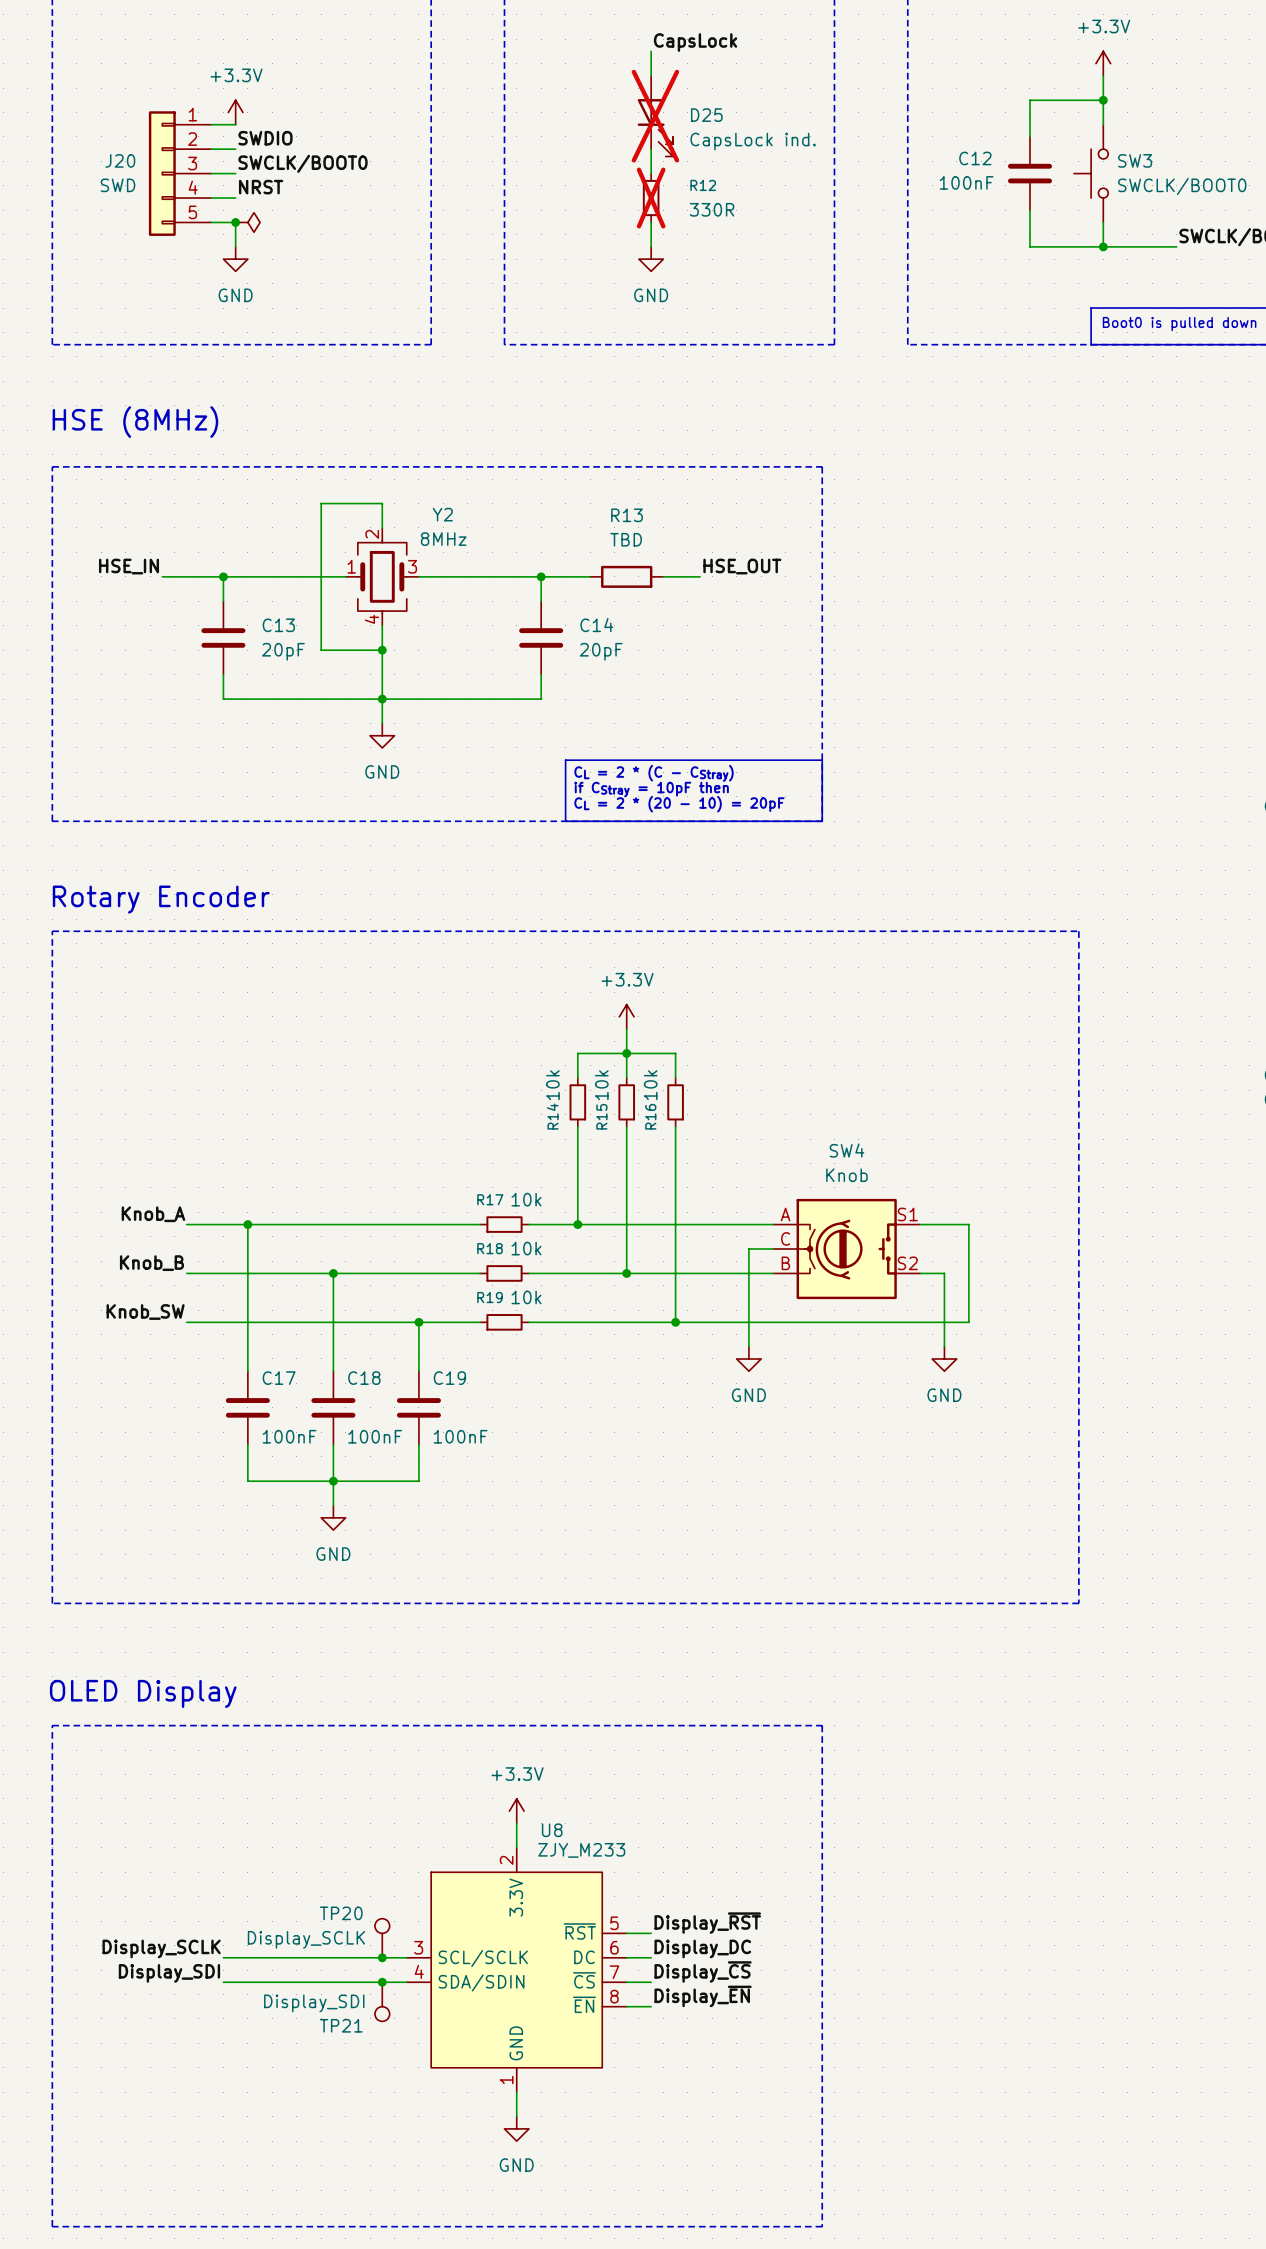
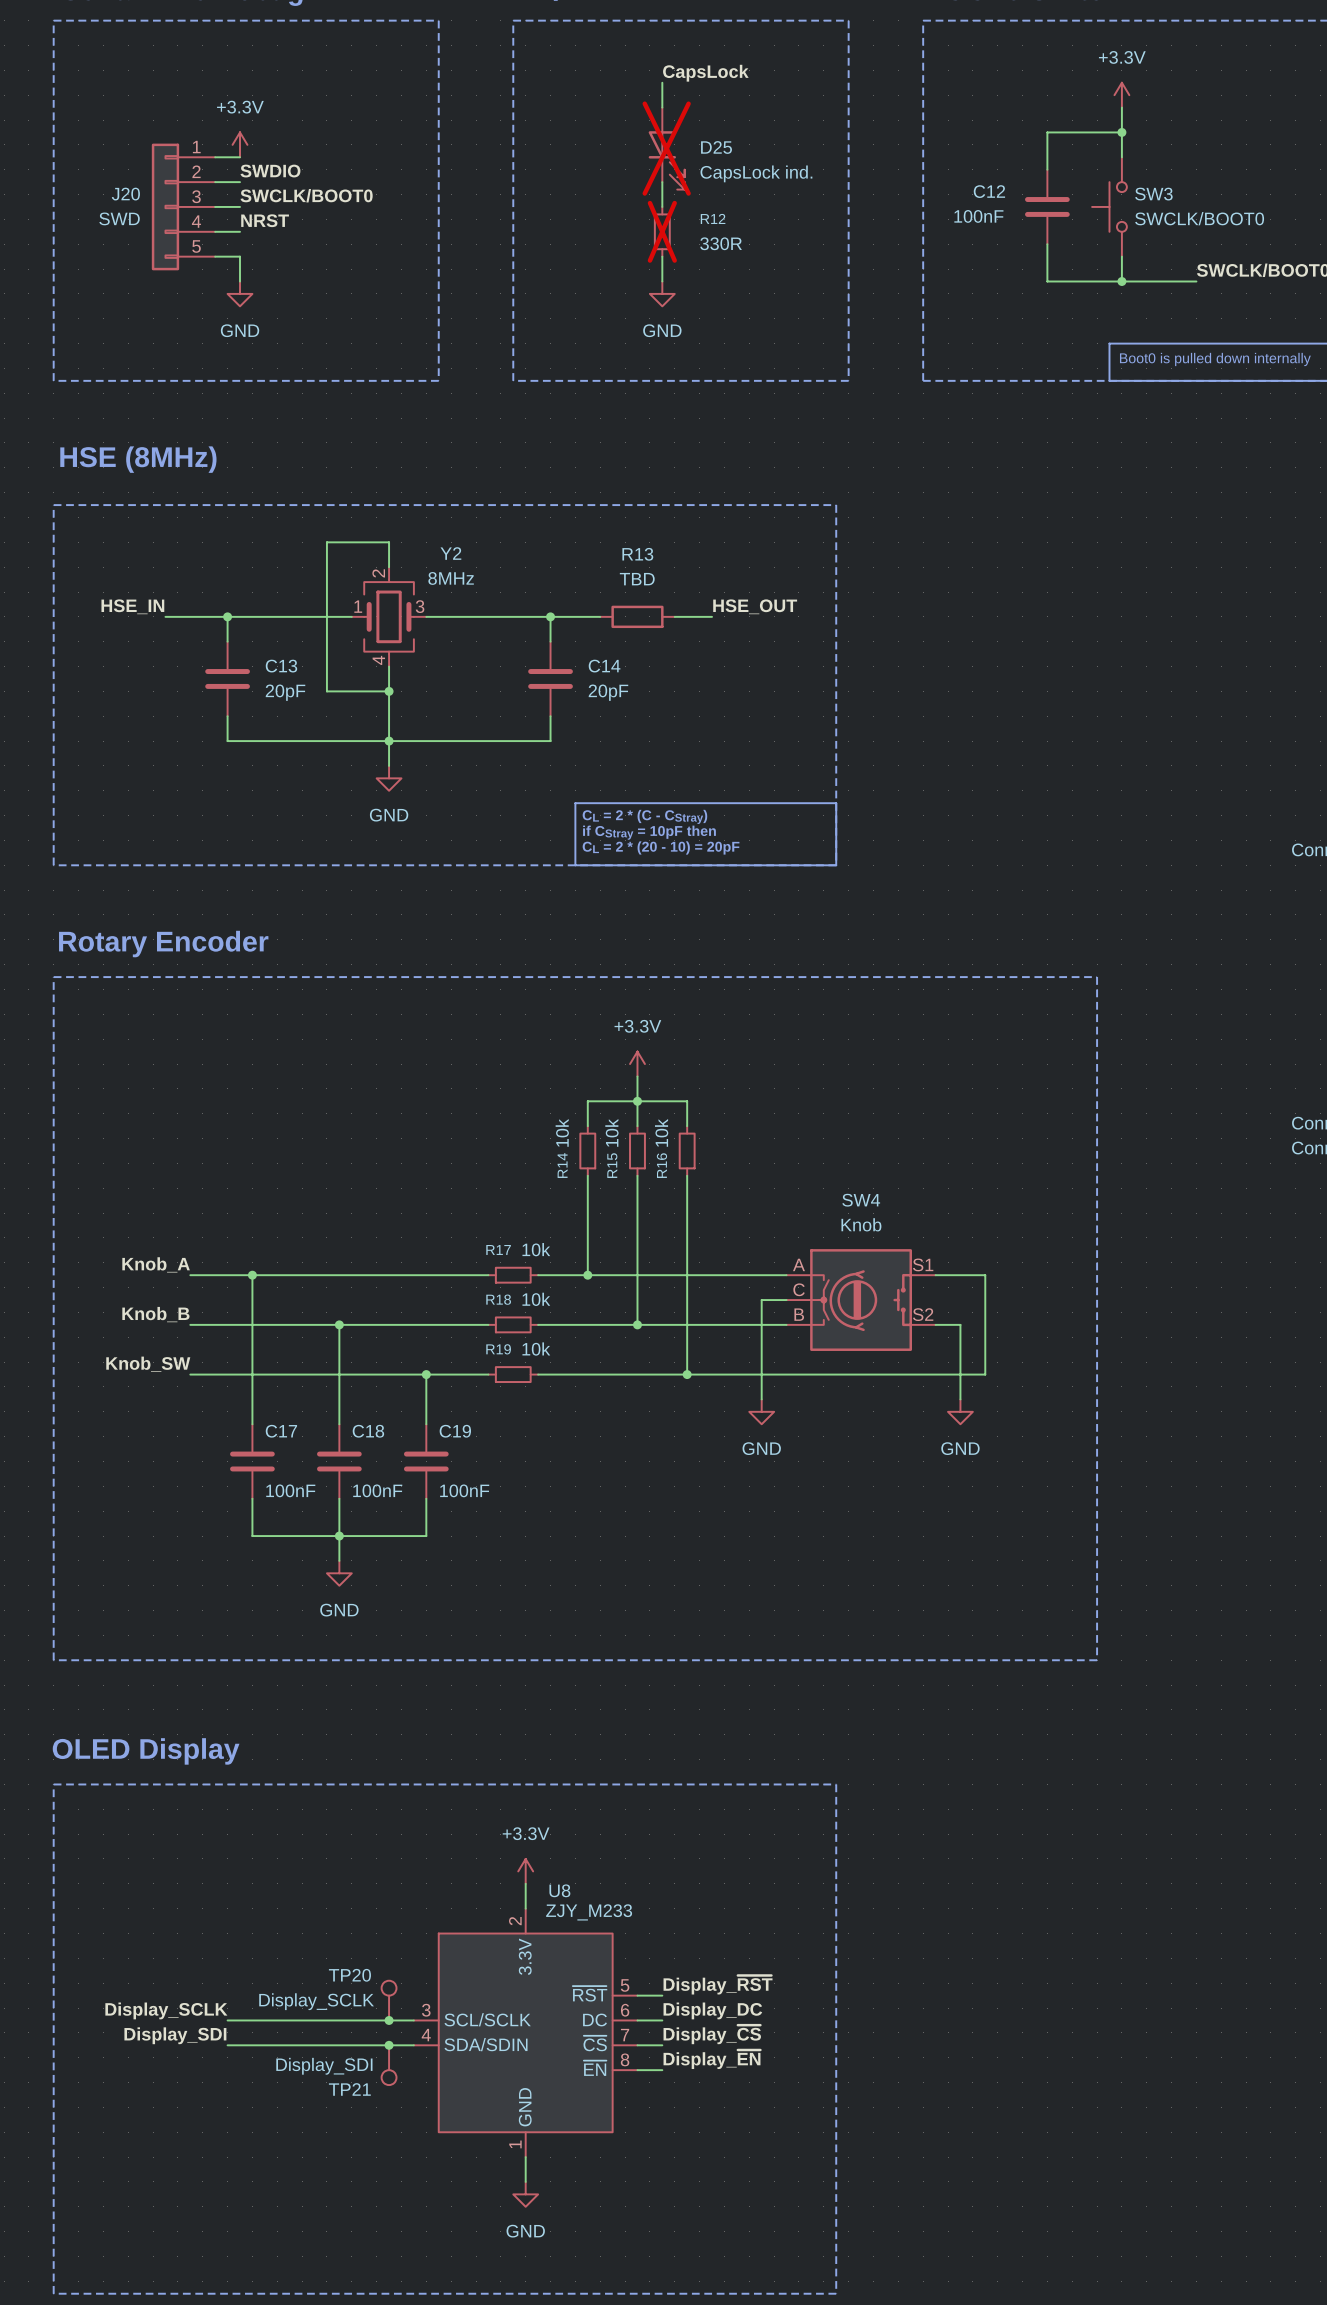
junction: (235, 222) -> none
power symbol: (247, 222) -> none

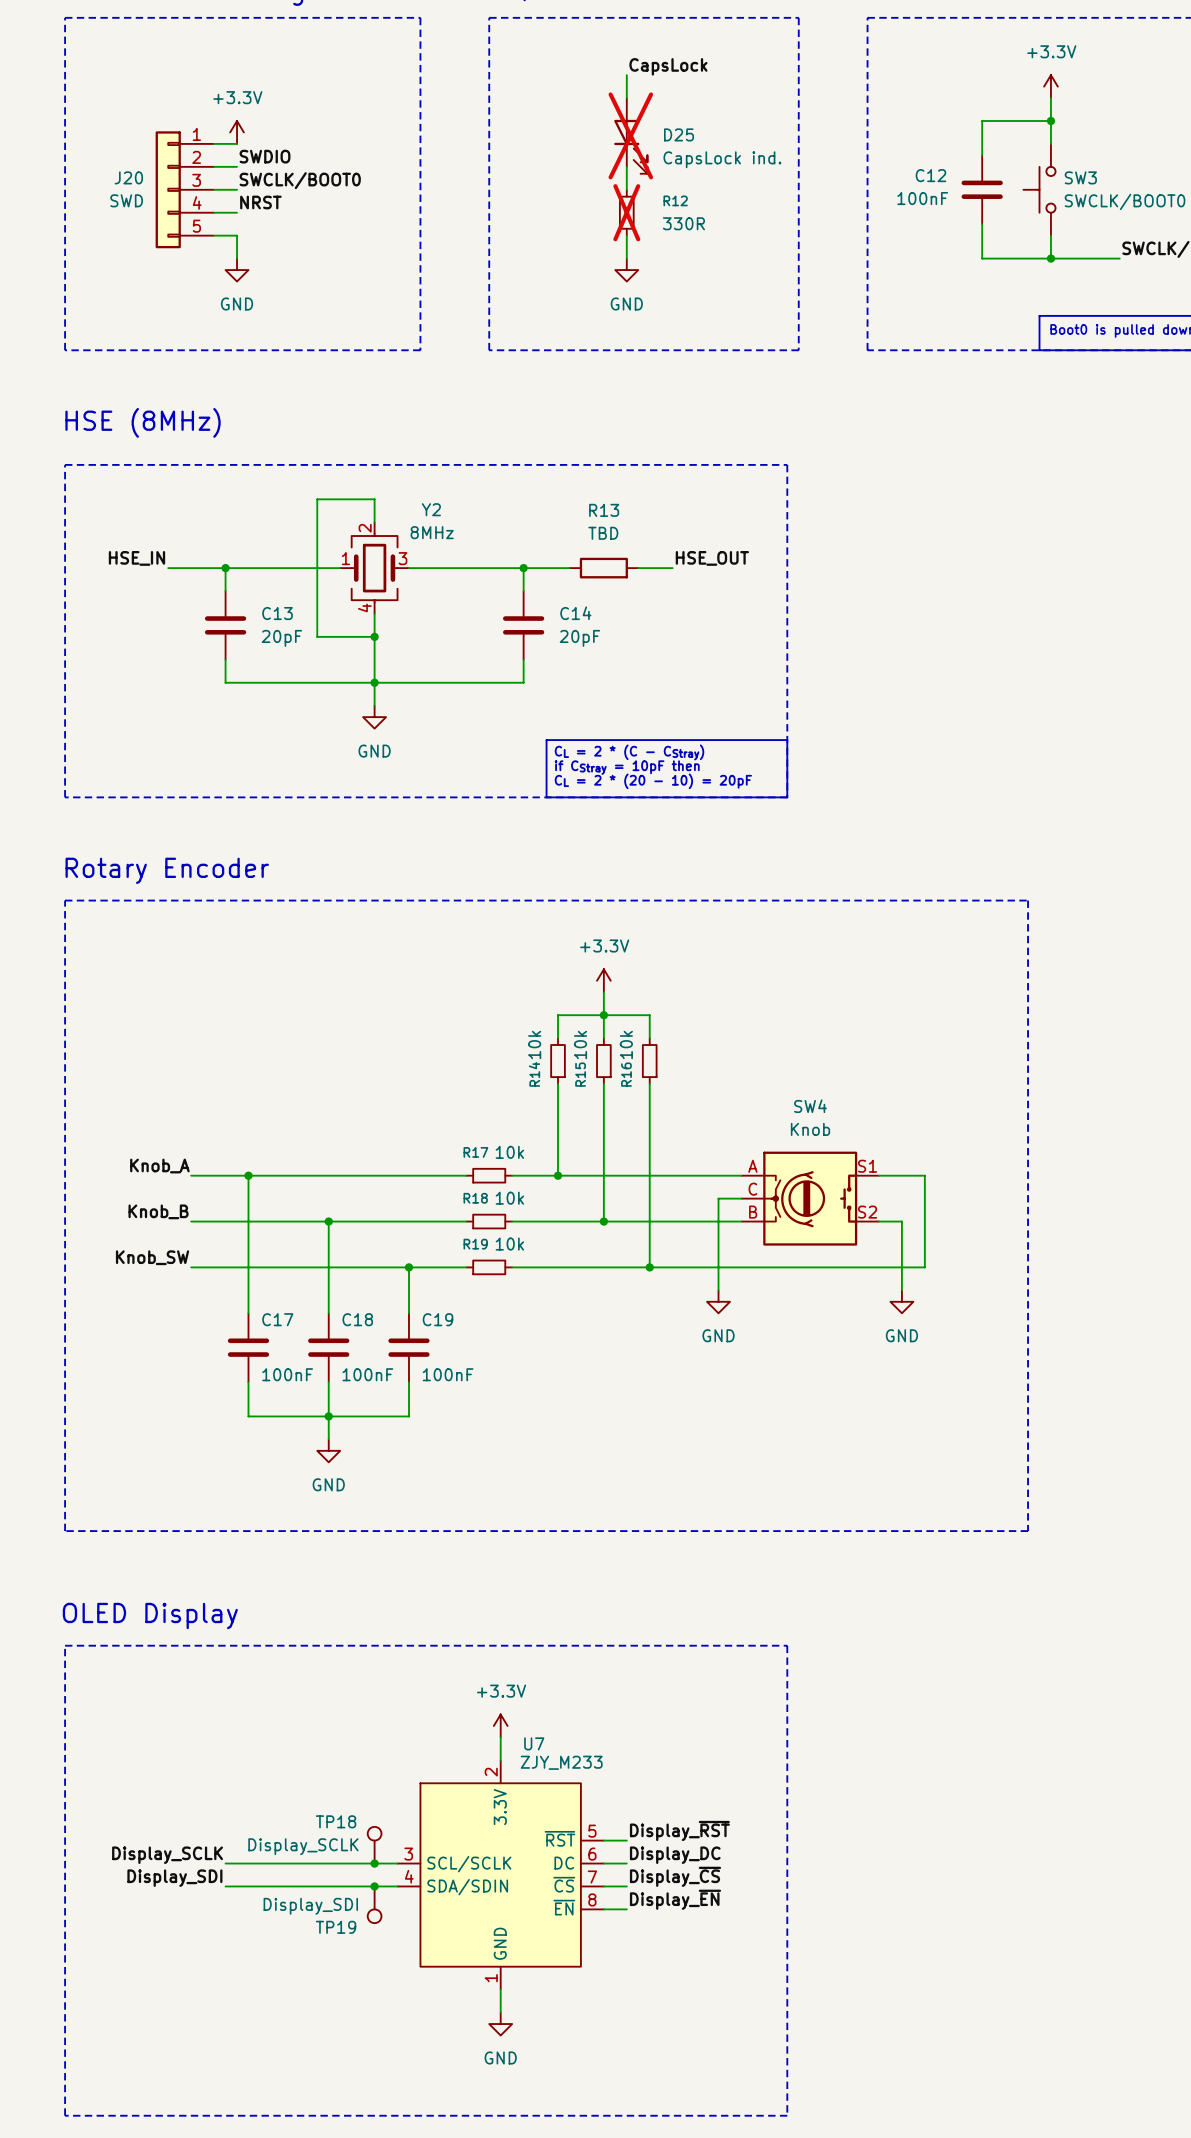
U8 name: U8 (559, 1890) -> U7 (534, 1743)
TP20 name: TP20 (349, 1975) -> TP18 (336, 1821)
TP21 name: TP21 (349, 2089) -> TP19 (336, 1927)

